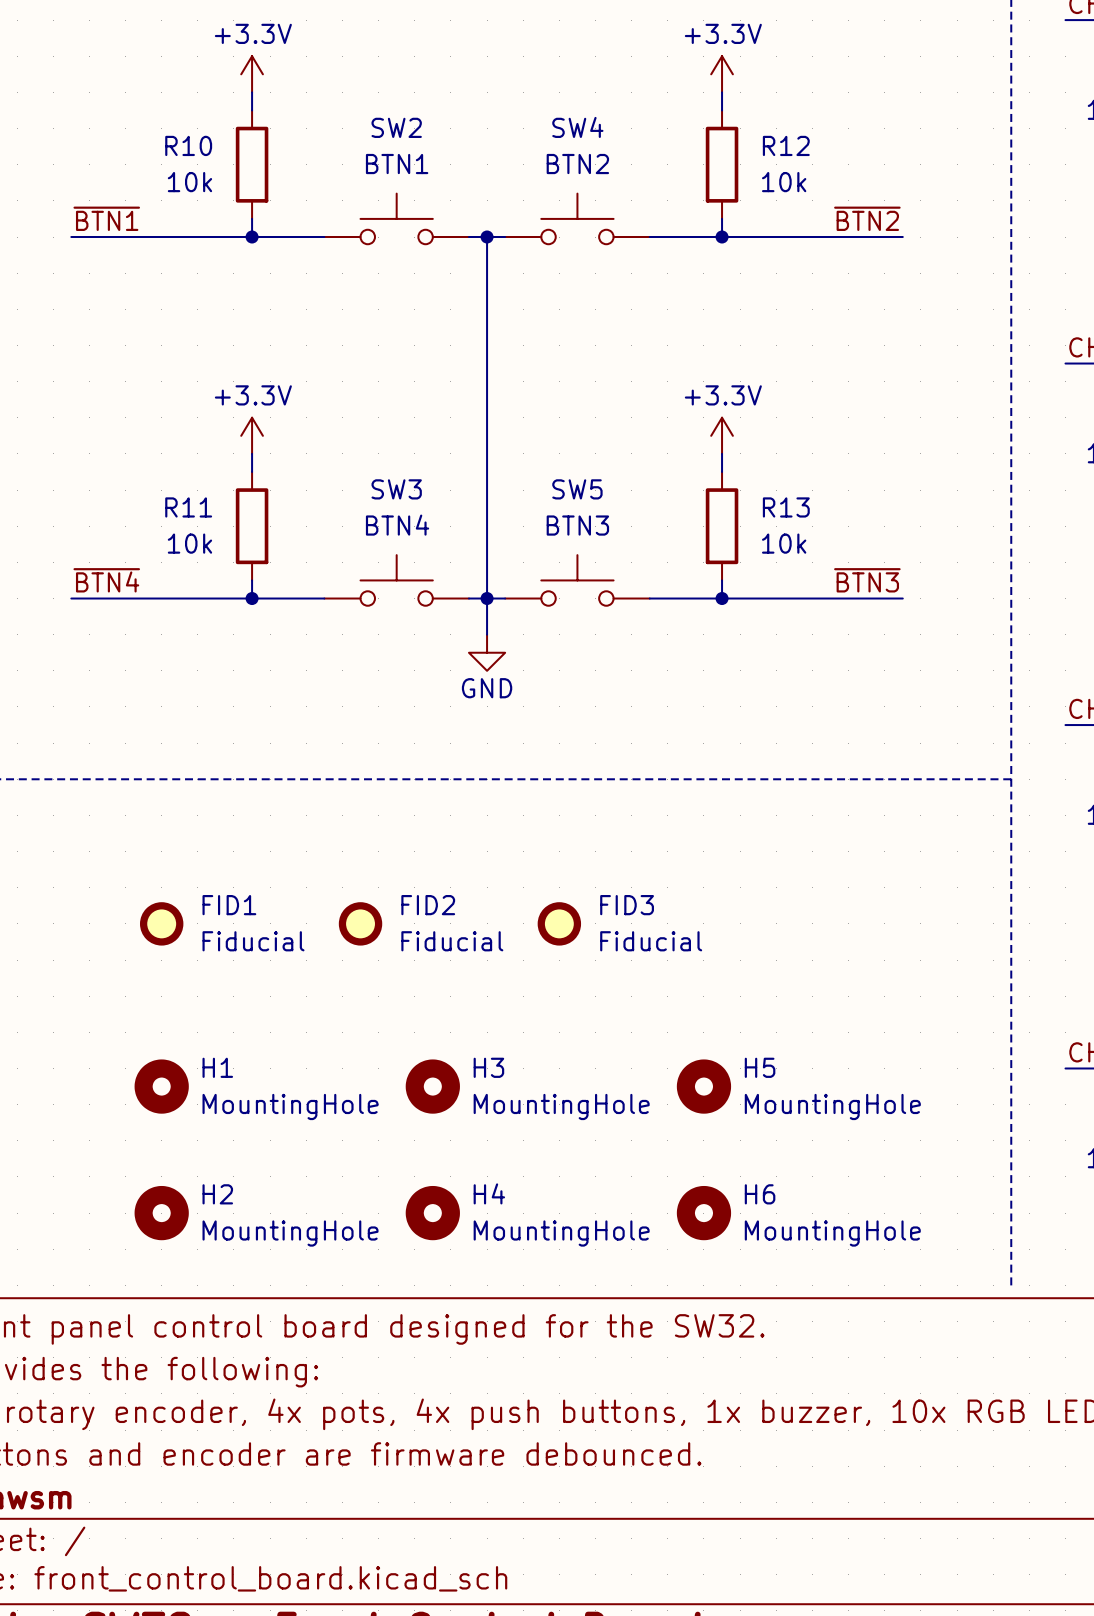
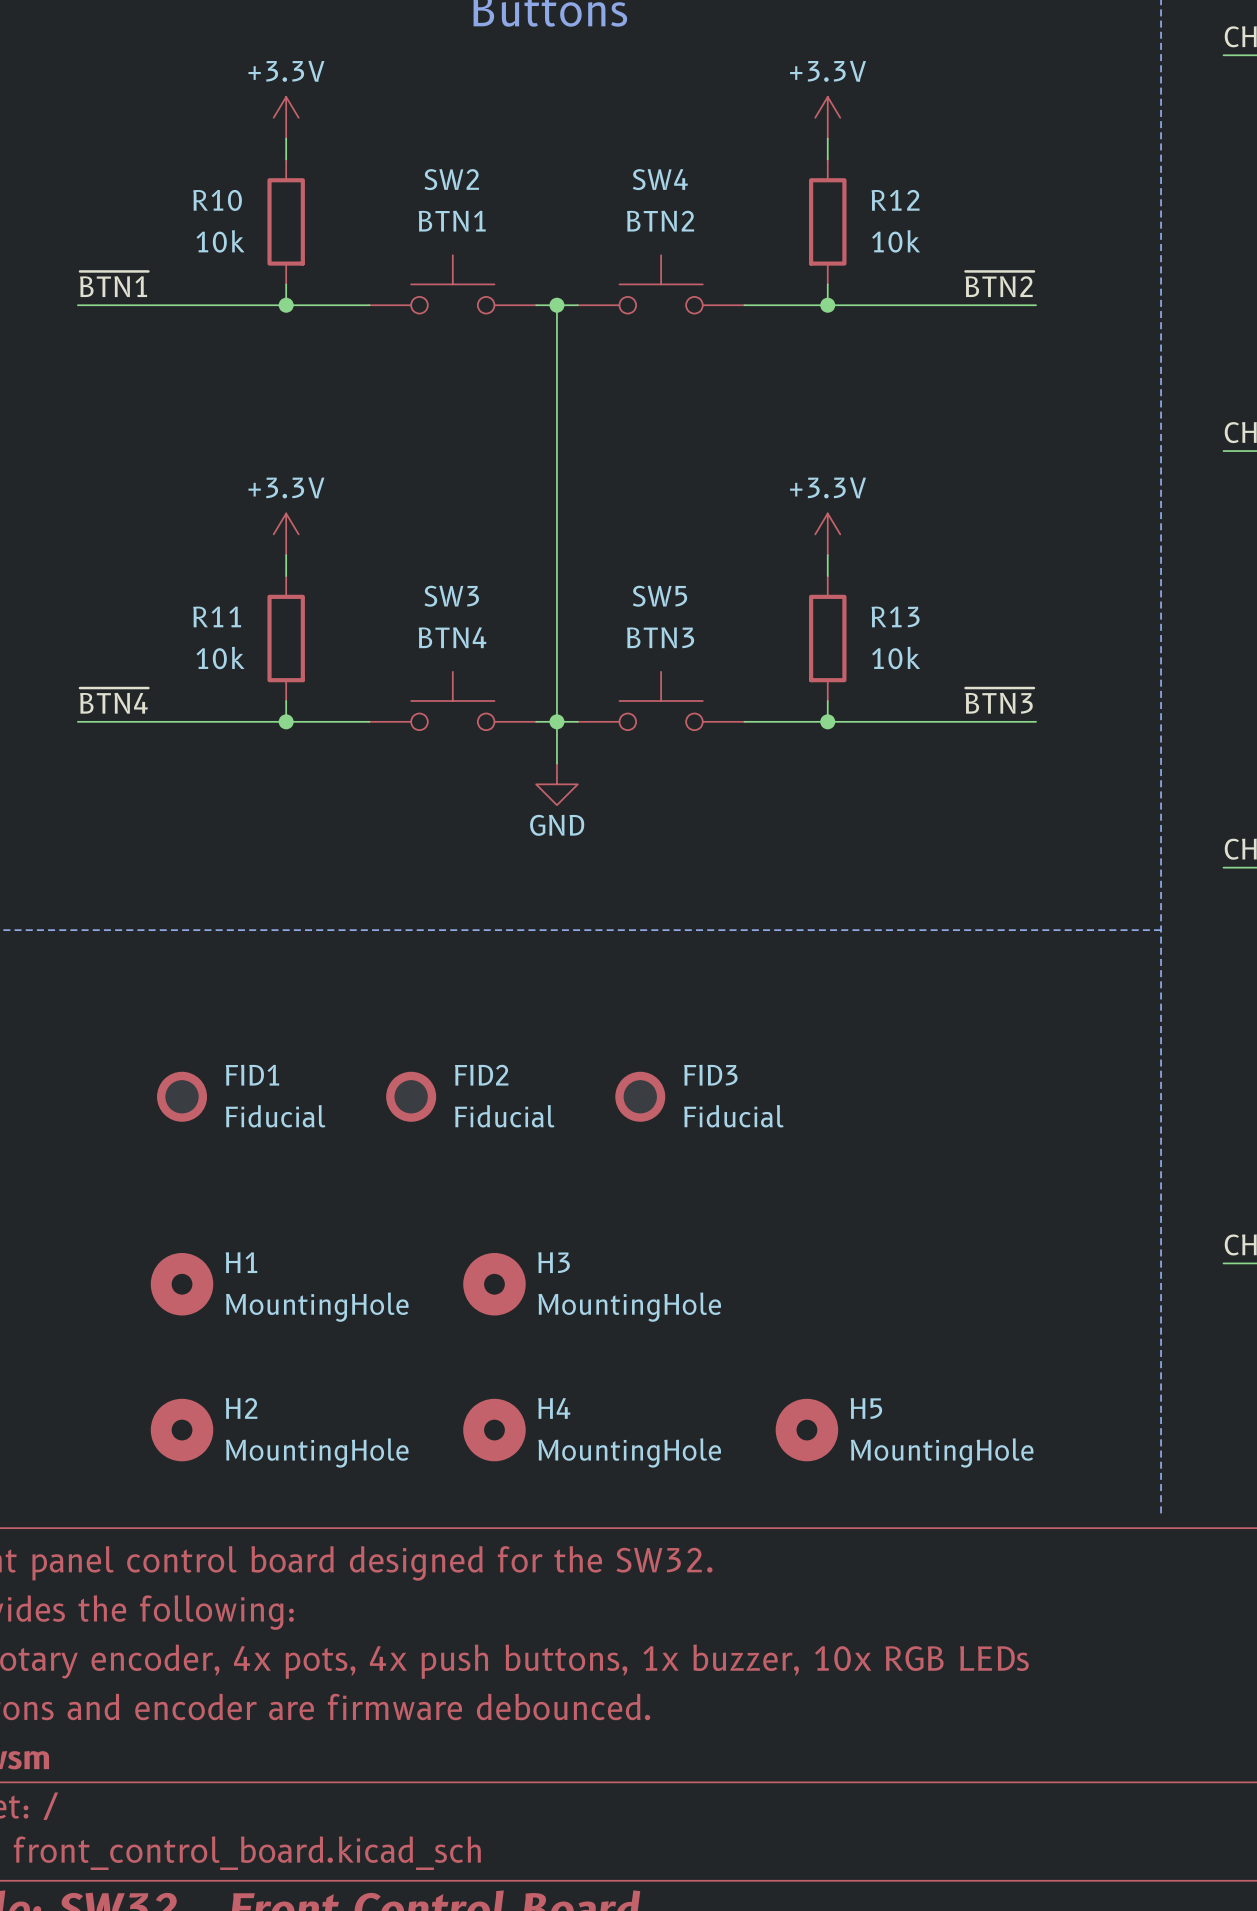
H5: MountingHole (703, 1086) -> none
H6 name: H6 (760, 1194) -> H5 (866, 1408)

